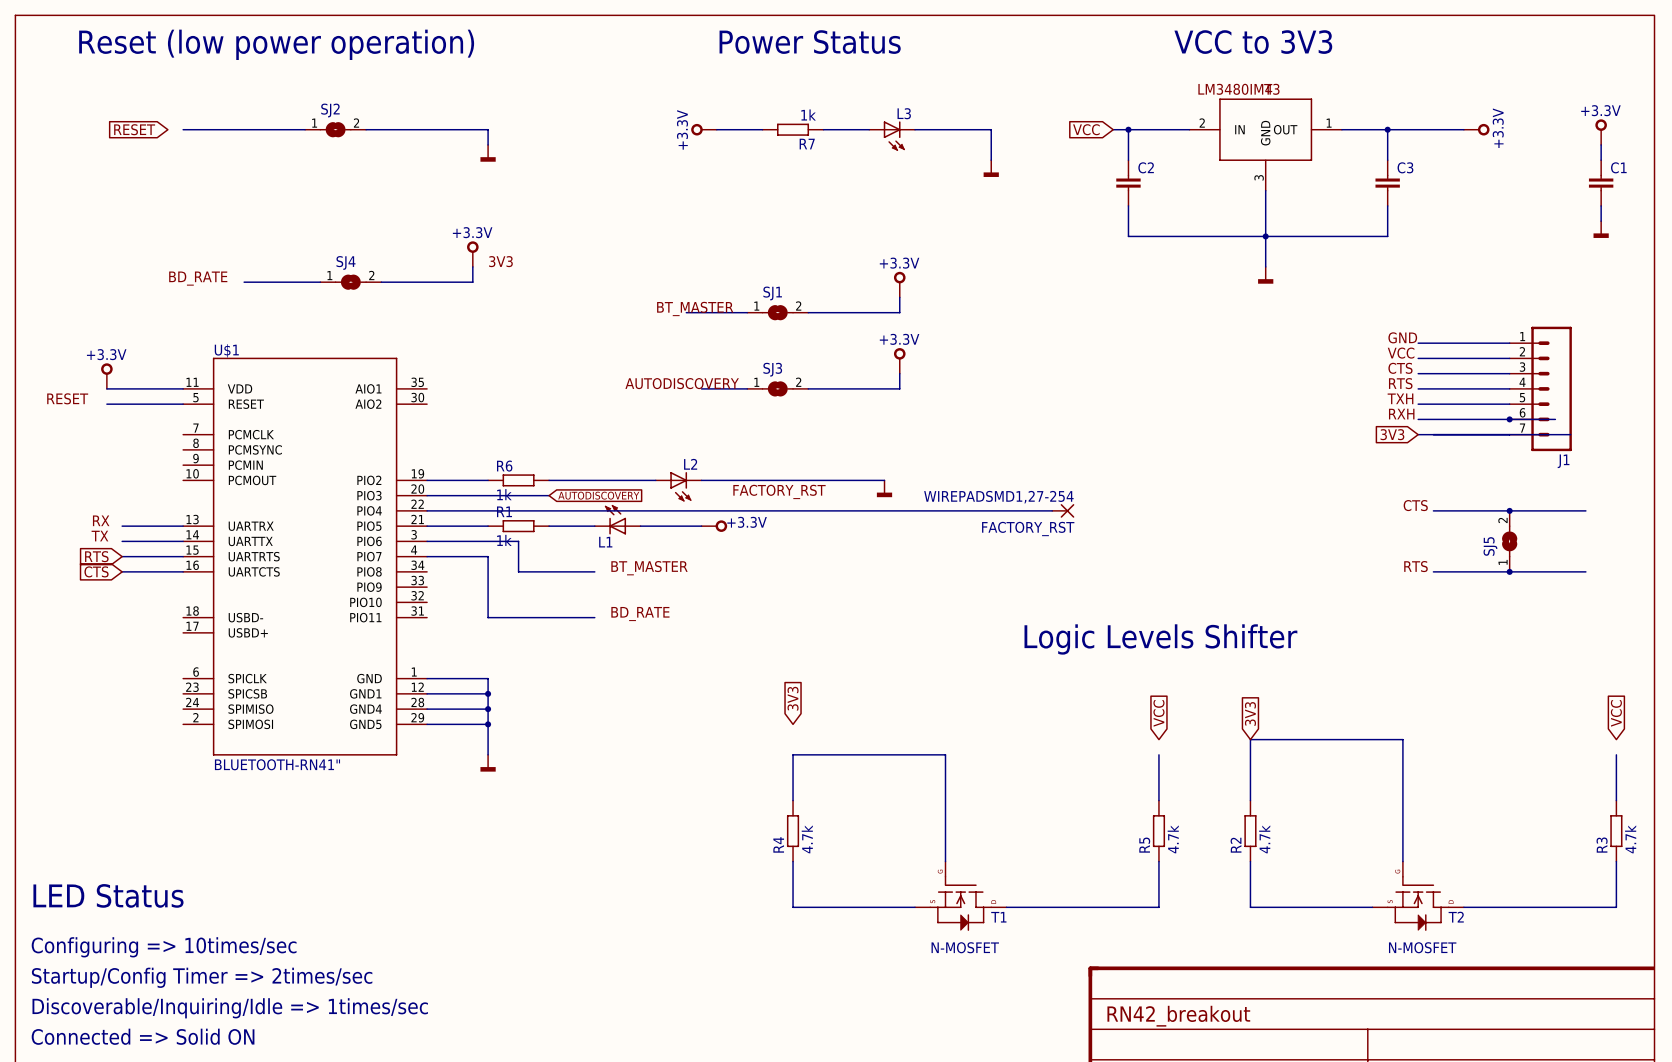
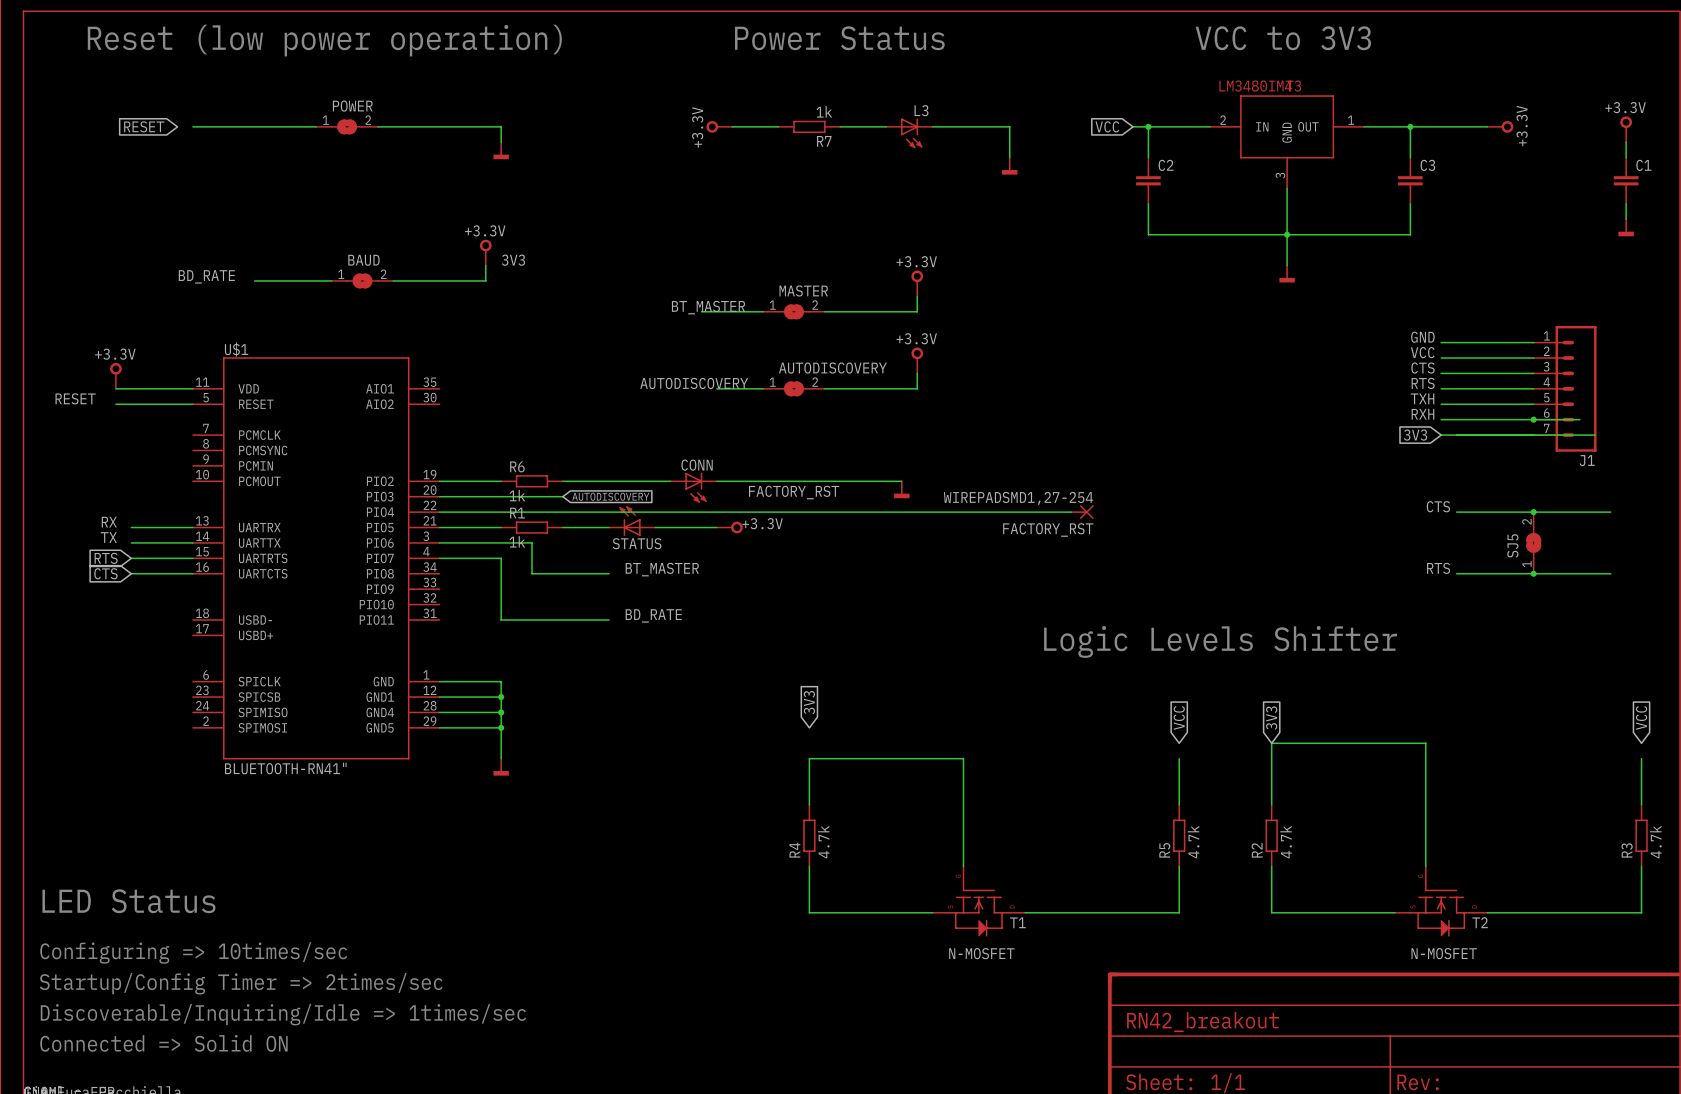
SJ2 name: SJ2 (330, 110) -> POWER (352, 106)
SJ4 name: SJ4 (345, 262) -> BAUD (363, 260)
SJ1 name: SJ1 (772, 293) -> MASTER (803, 290)
SJ3 name: SJ3 (772, 369) -> AUTODISCOVERY (832, 368)
L2 name: L2 (690, 464) -> CONN (697, 465)
L1 name: L1 (605, 542) -> STATUS (637, 543)

